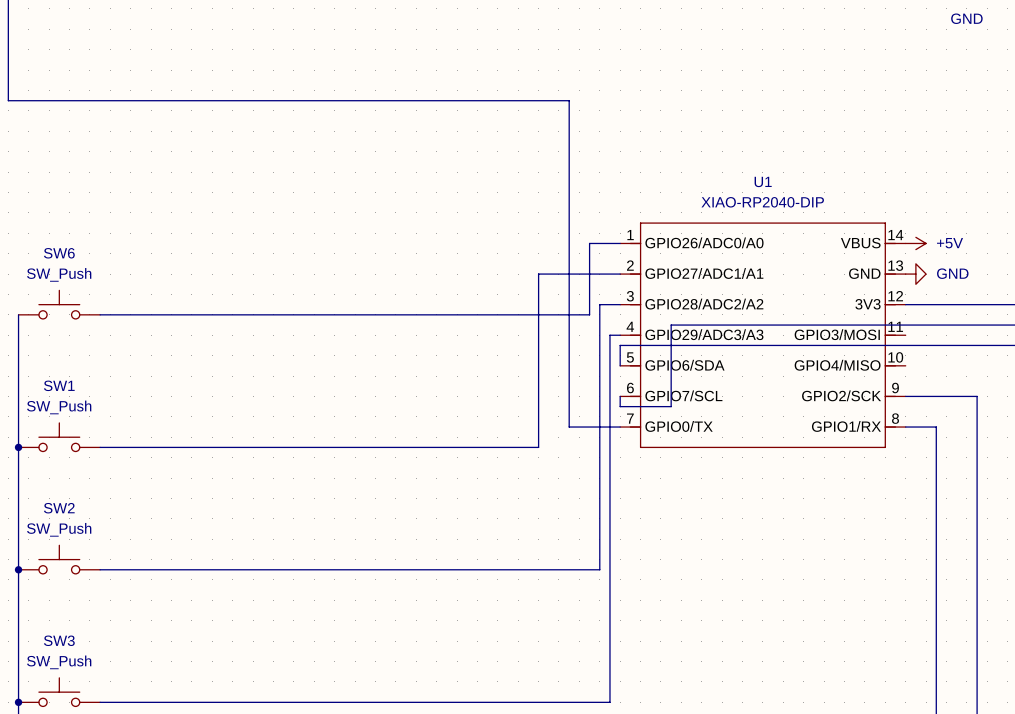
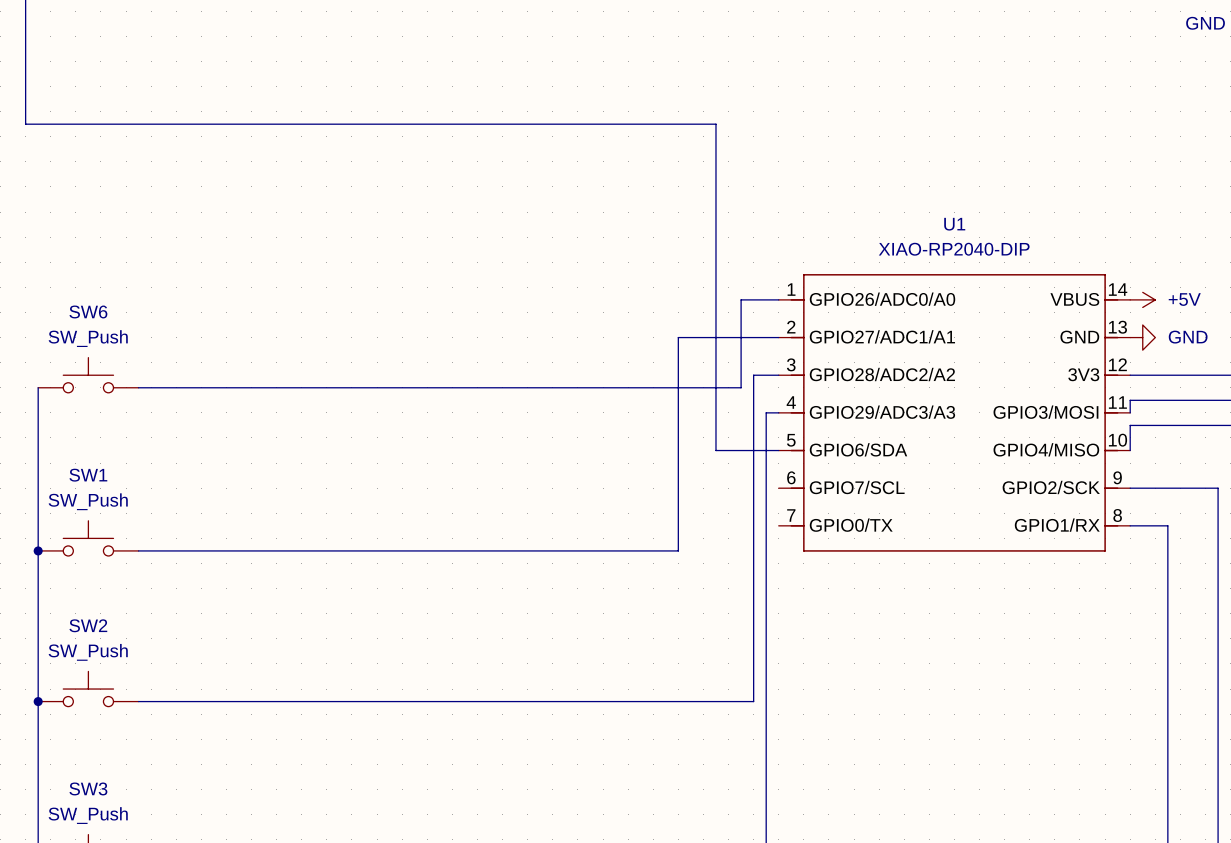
wire: (905, 325) (671, 325) (671, 406) (620, 406) (620, 396) -> (1130, 400) (1130, 412)
wire: (905, 345) (620, 345) (620, 365) -> (1130, 425) (1130, 450)
wire: (569, 365) (569, 427) (620, 427) -> (715, 450) (778, 450)

